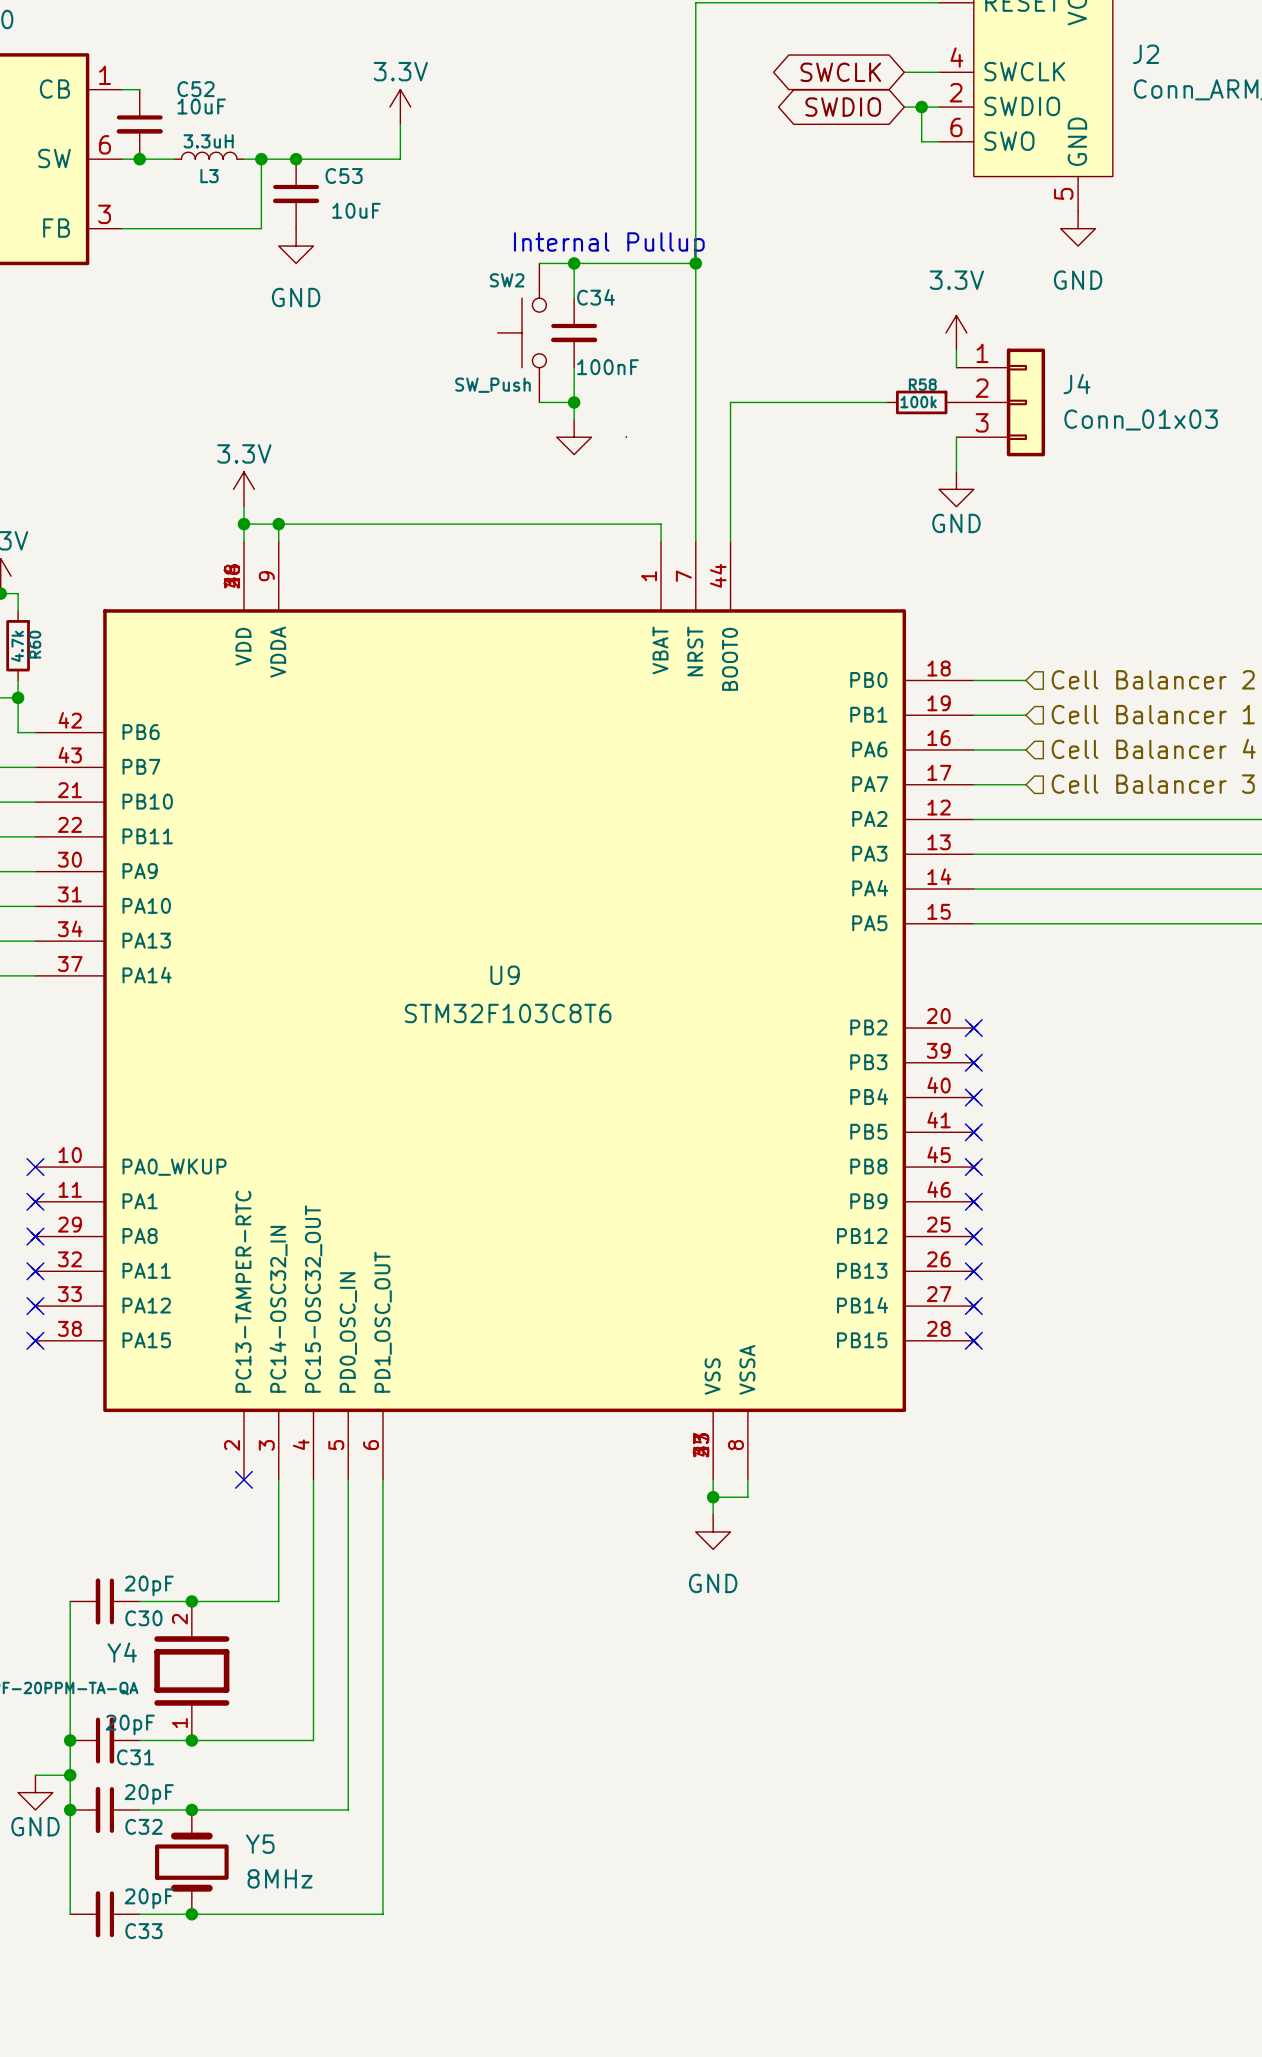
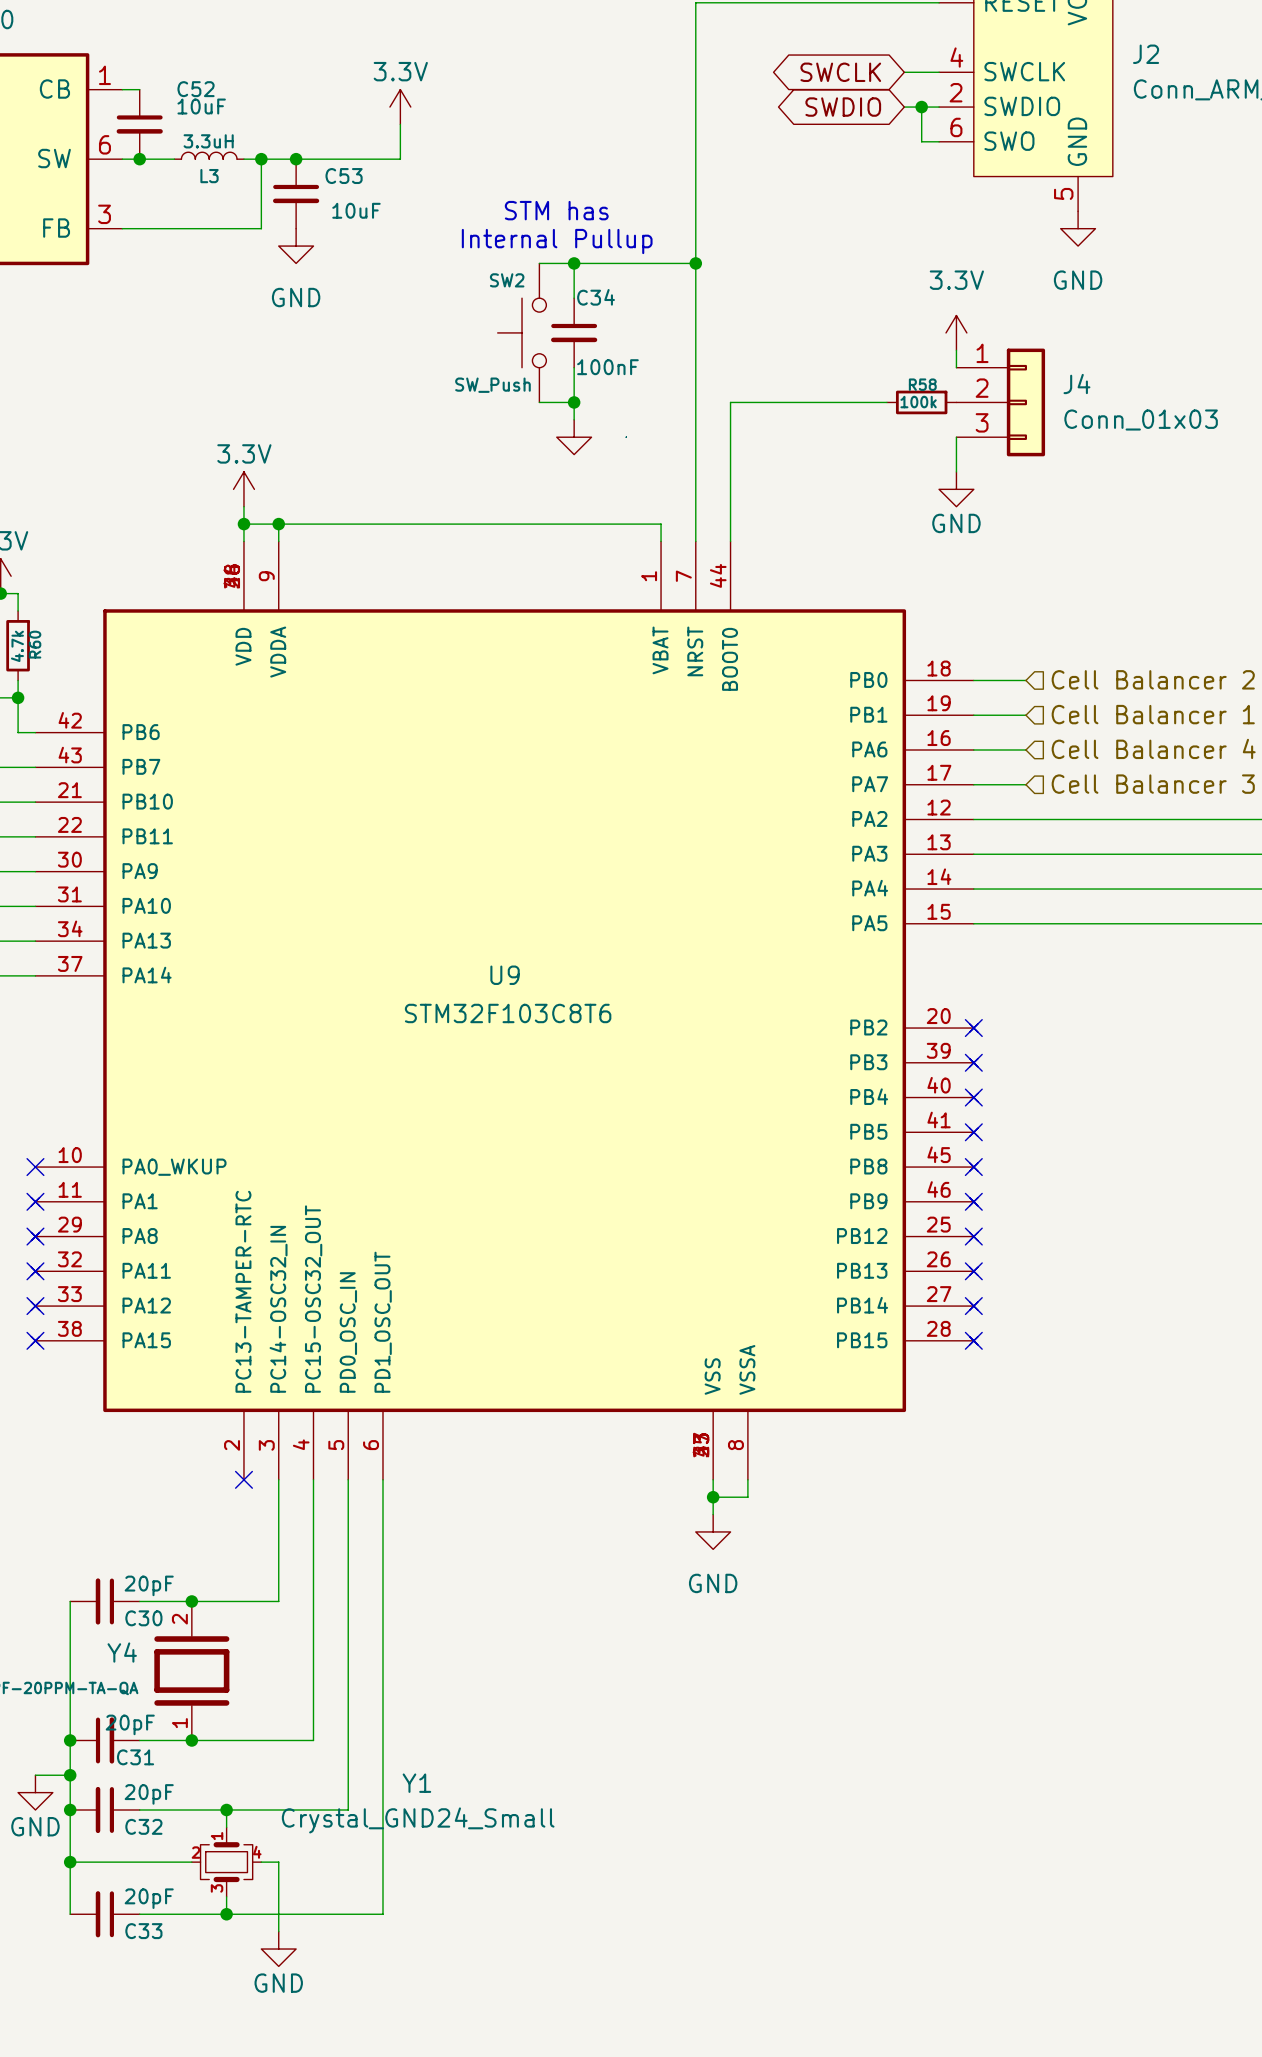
text: none -> STM has (556, 210)
text position: Internal Pullup (609, 244) -> Internal Pullup (557, 241)
junction position: (191, 1810) -> (226, 1810)
wire: none -> (226, 1810) (226, 1827)
wire: none -> (70, 1862) (191, 1862)
junction: none -> (70, 1862)
Y5: 8MHz (191, 1862) -> none
Y1: none -> Crystal_GND24_Small (226, 1862)
wire: none -> (261, 1862) (278, 1862) (278, 1931)
wire: none -> (226, 1896) (226, 1914)
junction position: (191, 1914) -> (226, 1914)
power symbol: none -> GND (278, 1949)

